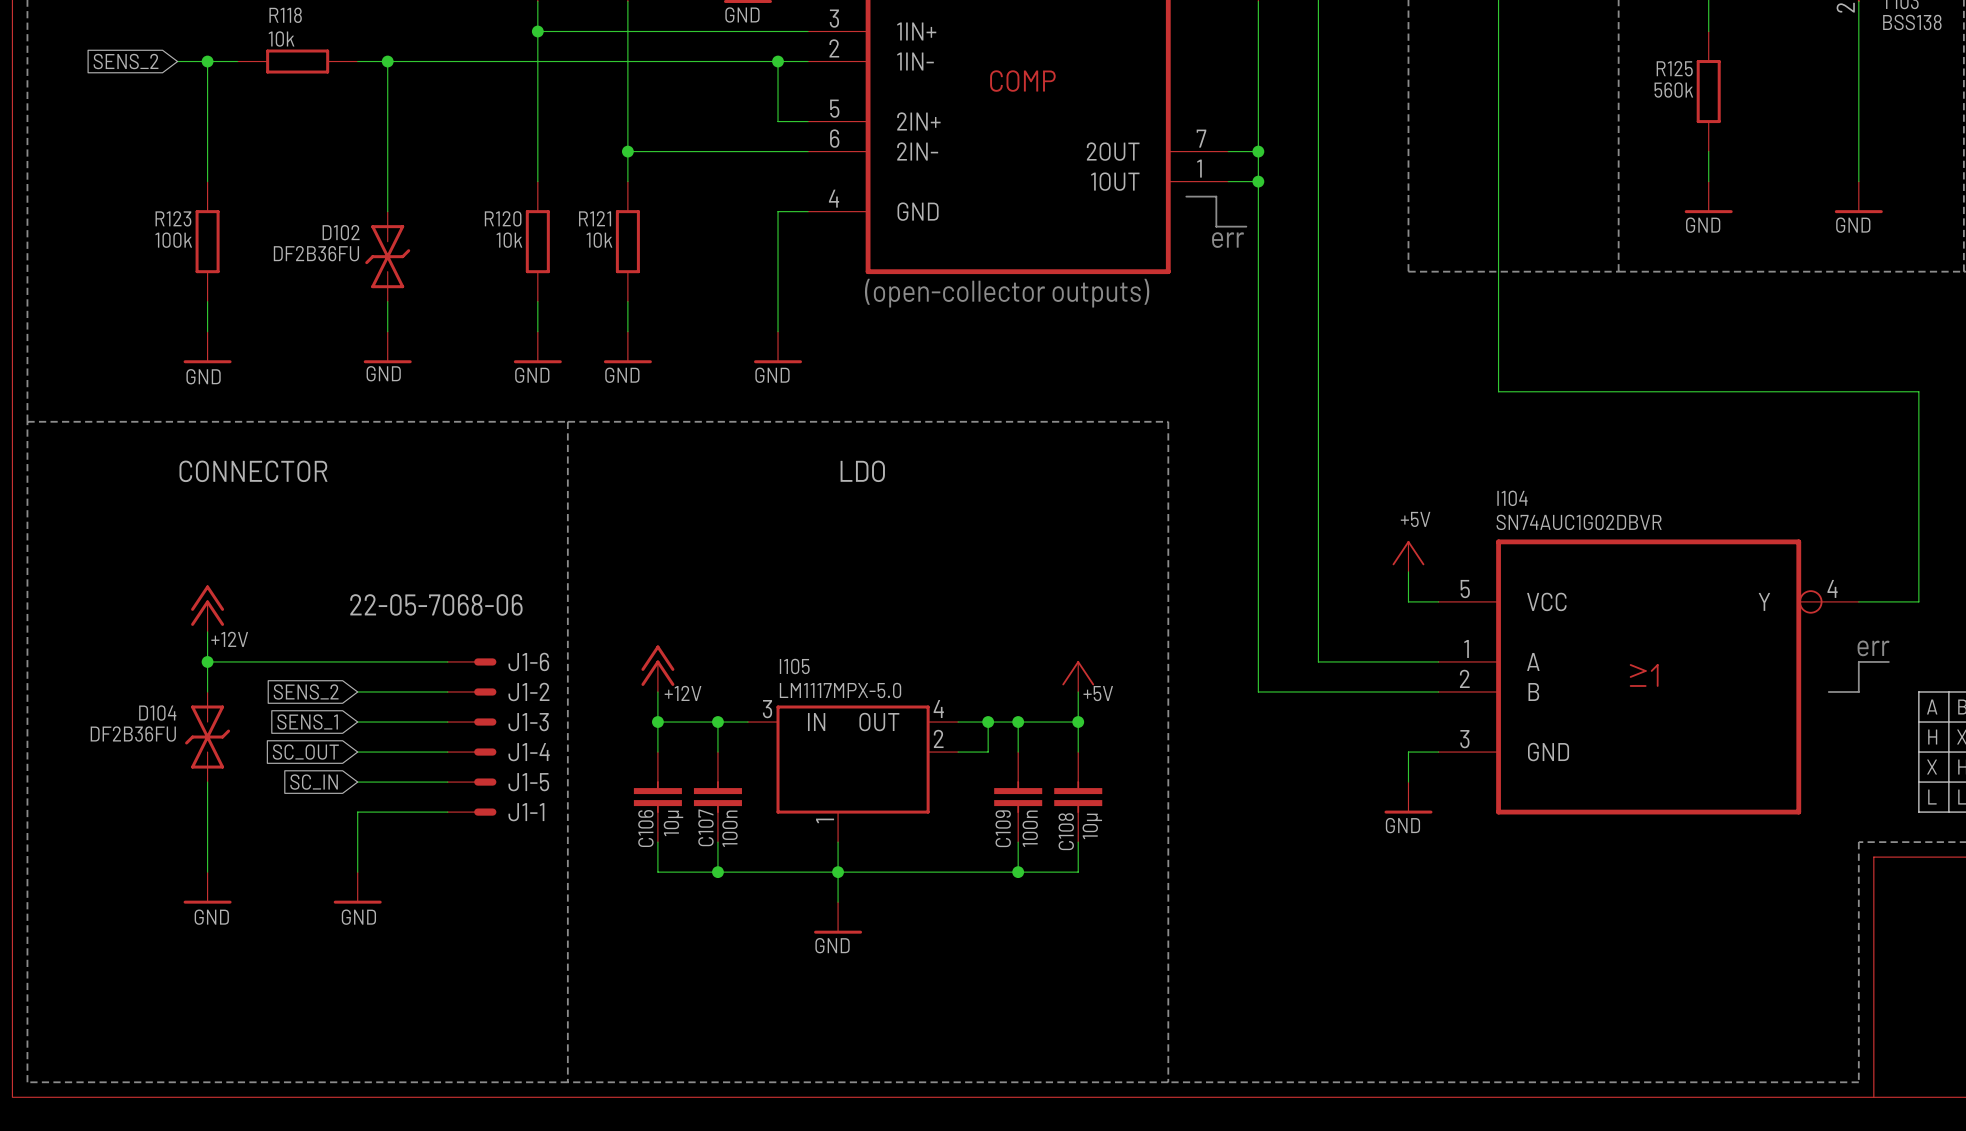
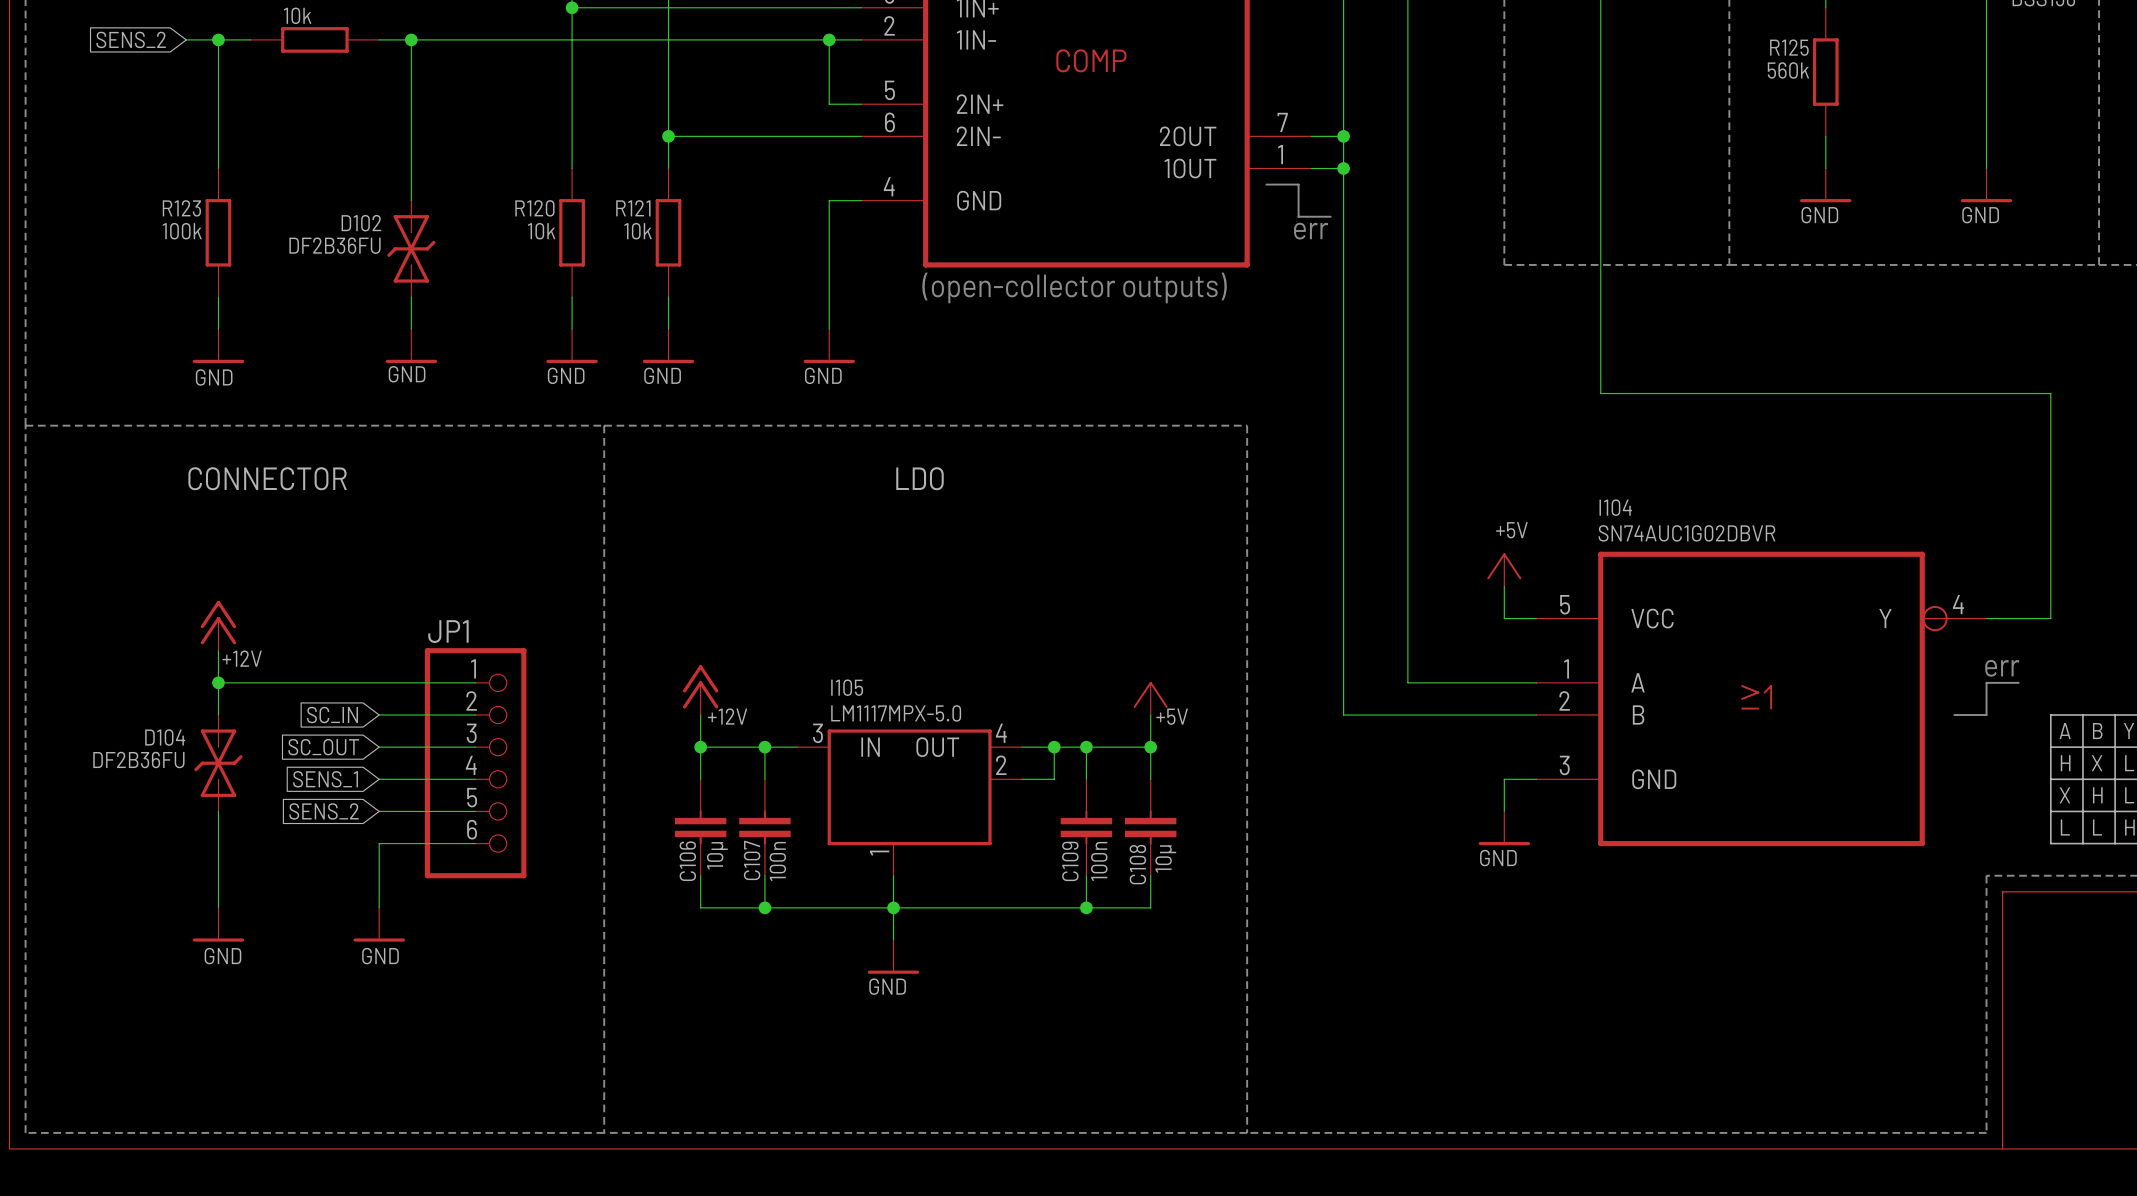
J1-6: (472, 661) -> none
global label: SENS_2 (306, 691) -> SC_IN (332, 715)
J1-2: (472, 691) -> none
global label: SENS_1 (307, 722) -> SC_OUT (323, 747)
J1-3: (472, 722) -> none
JP1: none -> (475, 763)
global label: SC_OUT (305, 752) -> SENS_1 (325, 779)
J1-4: (472, 752) -> none
global label: SC_IN (314, 782) -> SENS_2 (323, 811)
J1-5: (472, 782) -> none
J1-1: 22-05-7068-06 (472, 812) -> none

